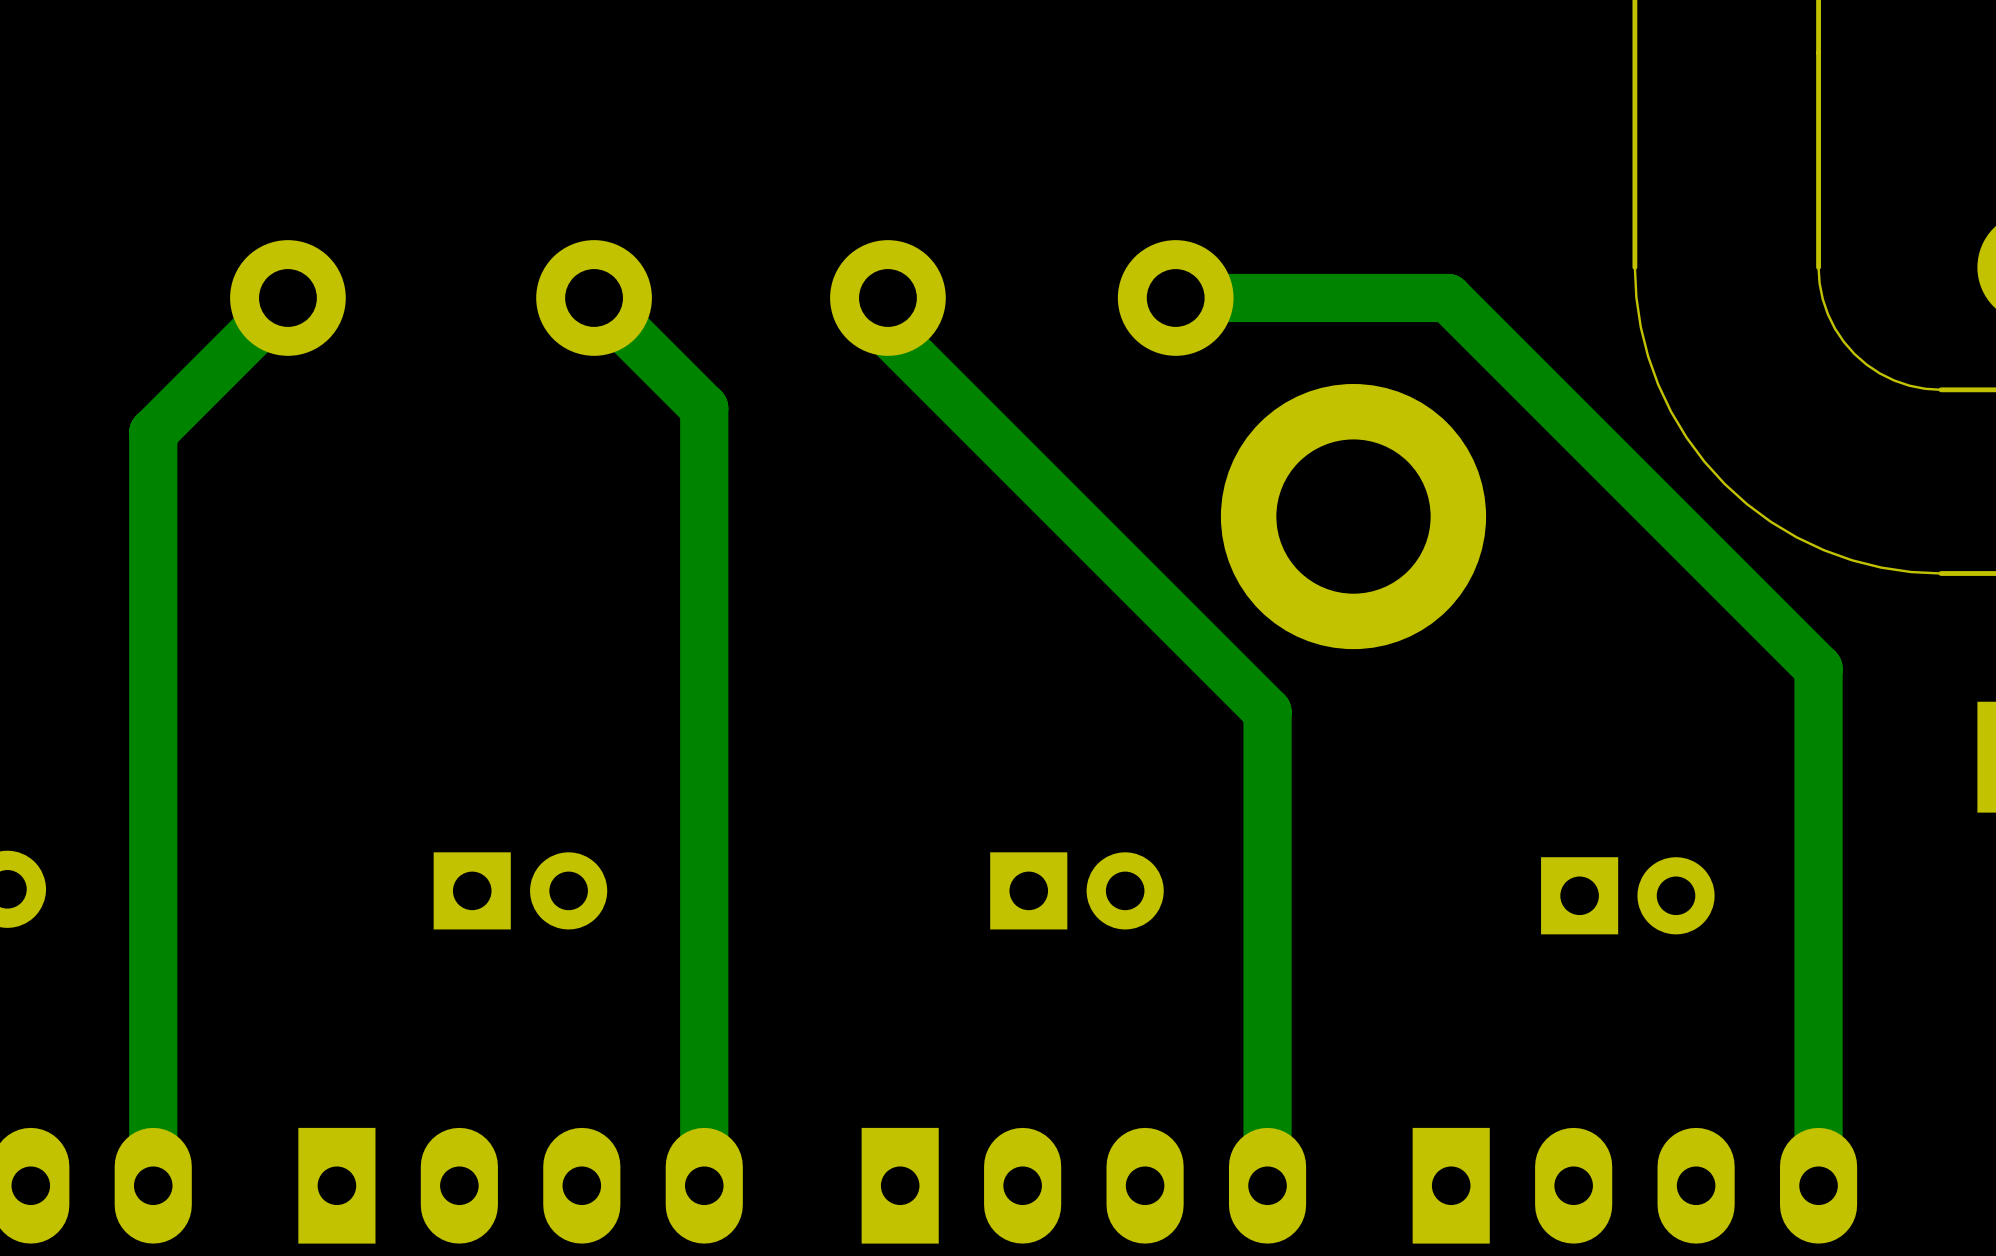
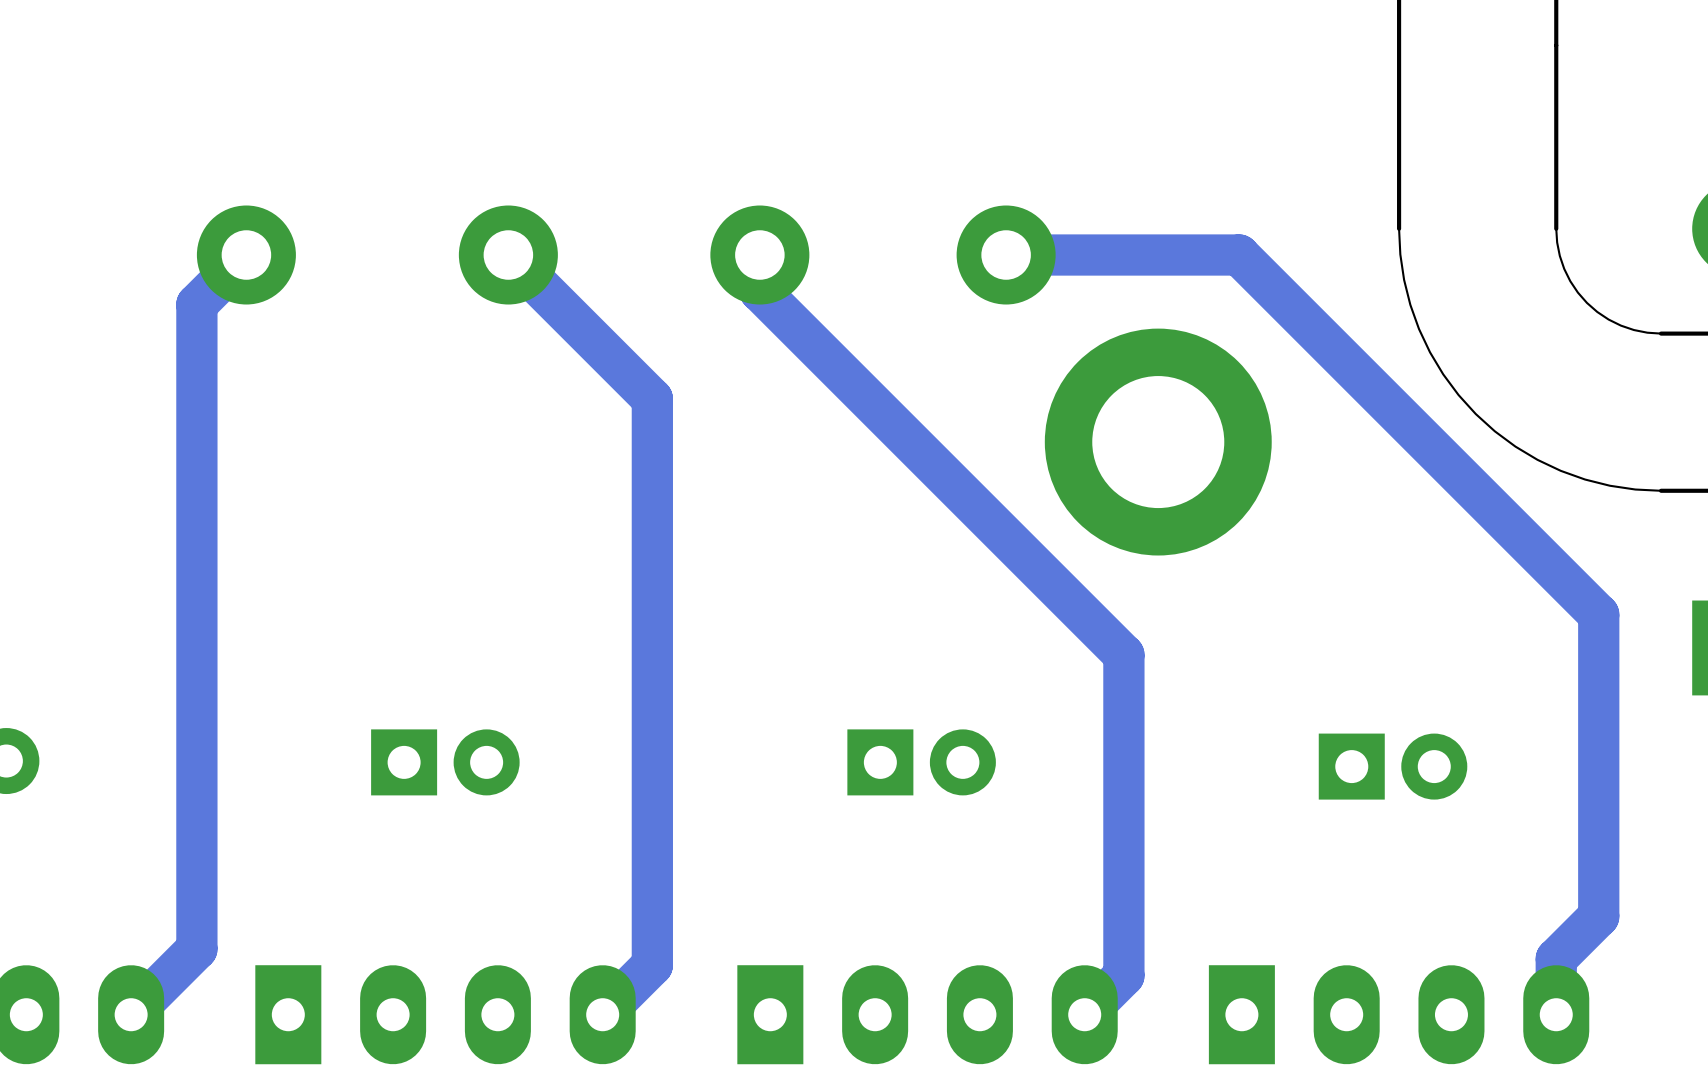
track: (887, 332) (1267, 711) (1267, 1185) -> (759, 284) (759, 290) (1123, 654) (1123, 975) (1084, 1014)
track: (230, 355) (153, 432) (153, 1185) -> (196, 304) (196, 948) (131, 1014)
track: (704, 408) (704, 1185) -> (602, 349) (652, 398) (652, 965) (602, 1014)
track: (1818, 668) (1818, 1120) -> (1556, 572) (1598, 614) (1598, 916) (1556, 958)

